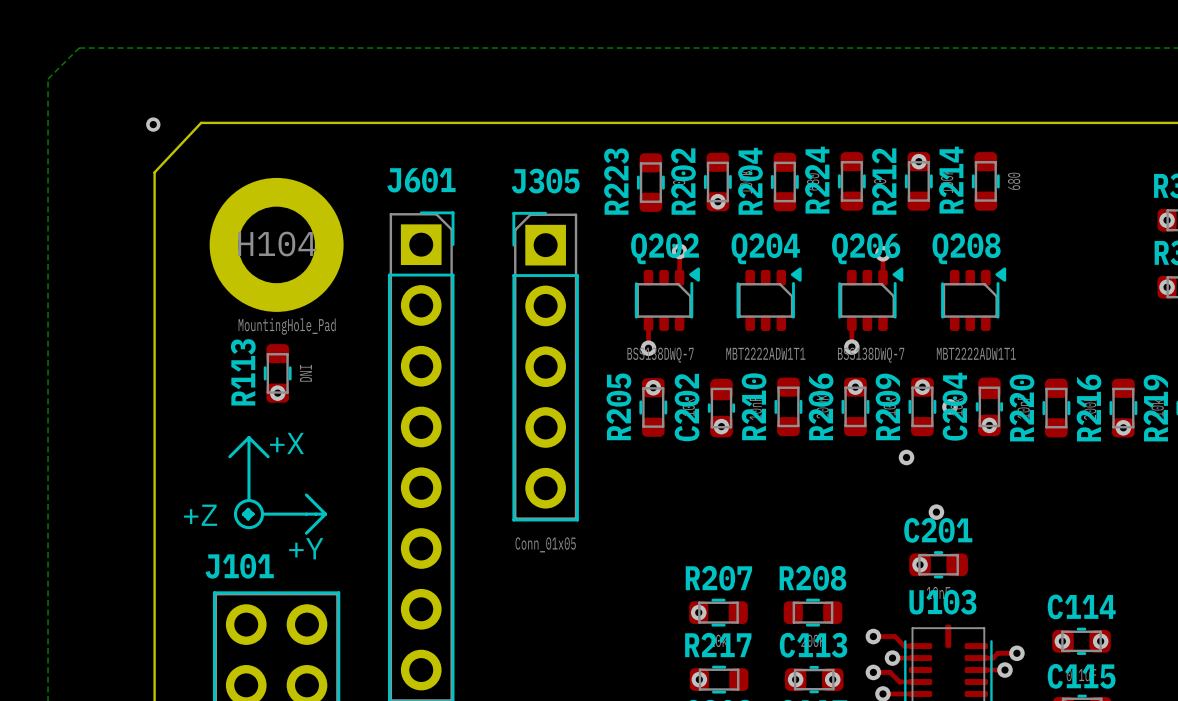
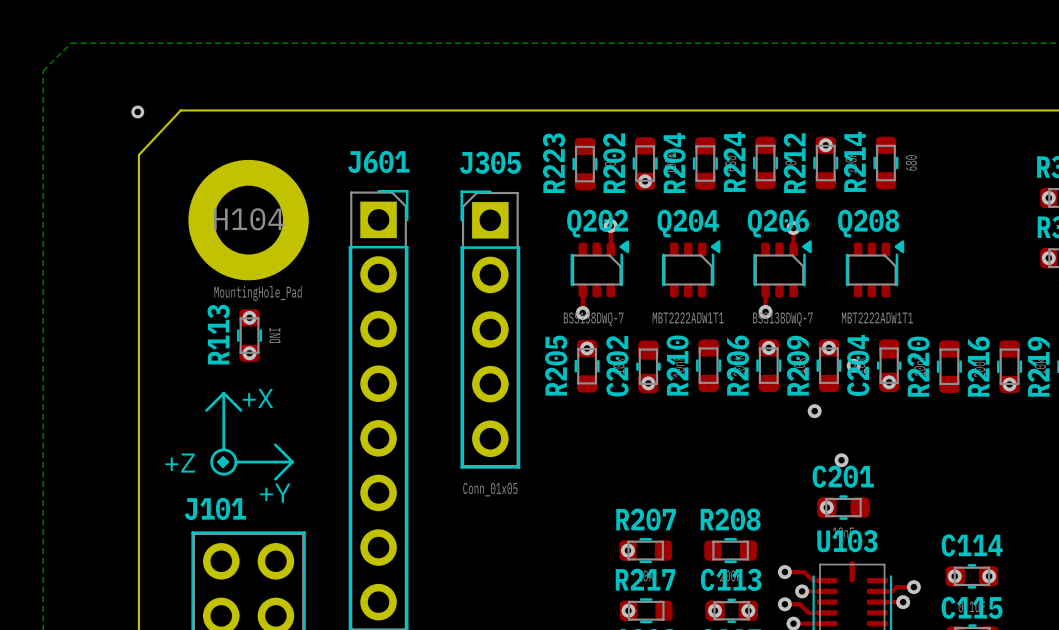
via: none -> (249, 317)

